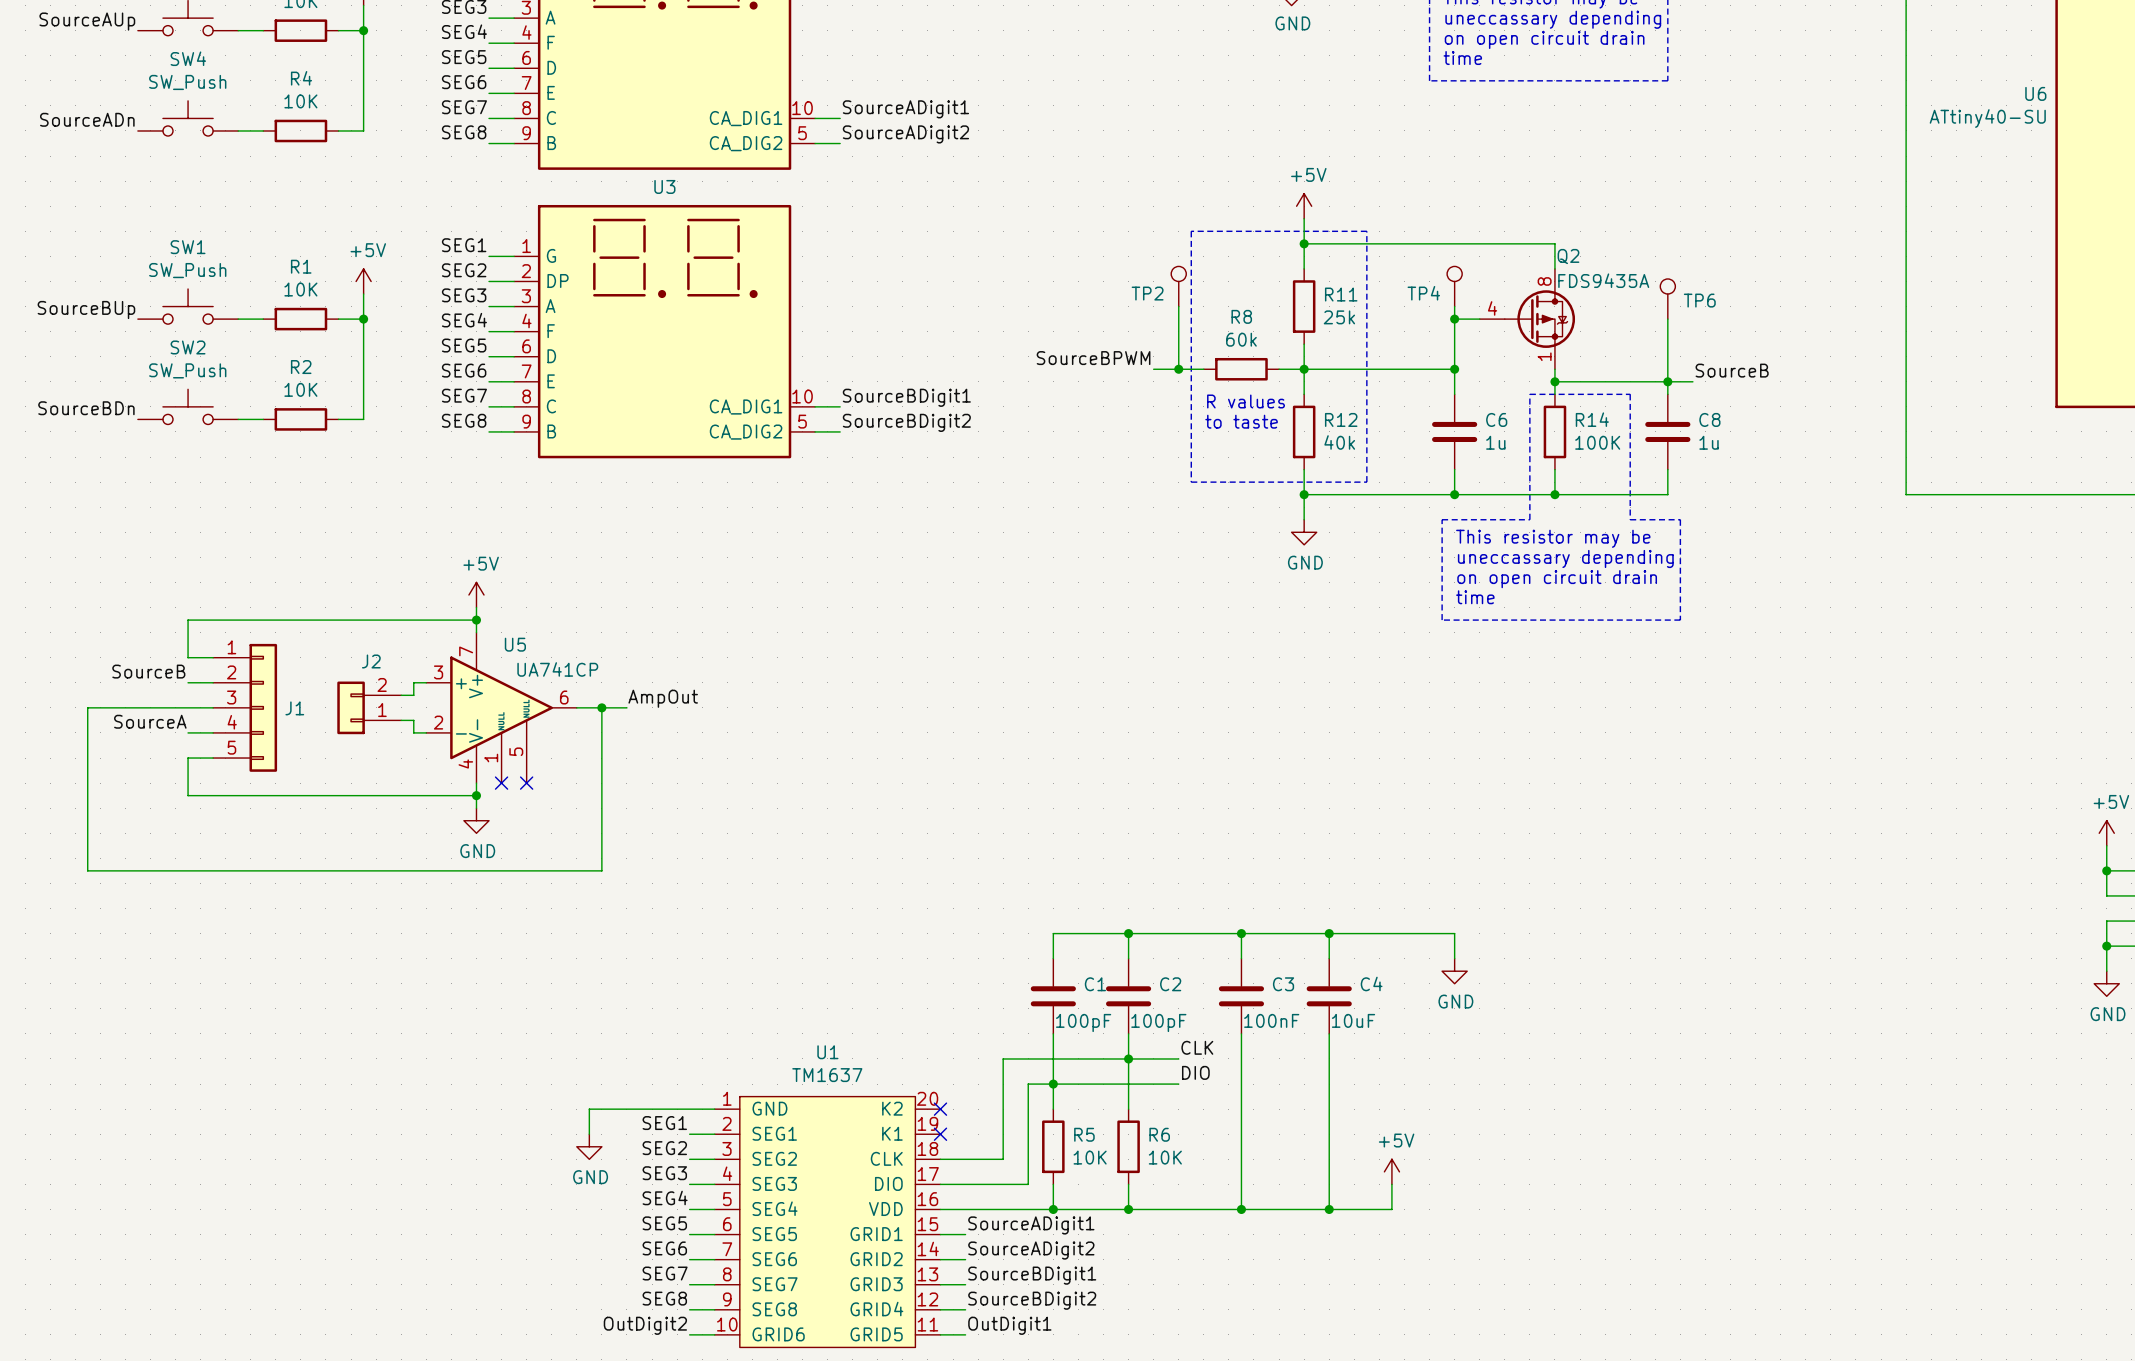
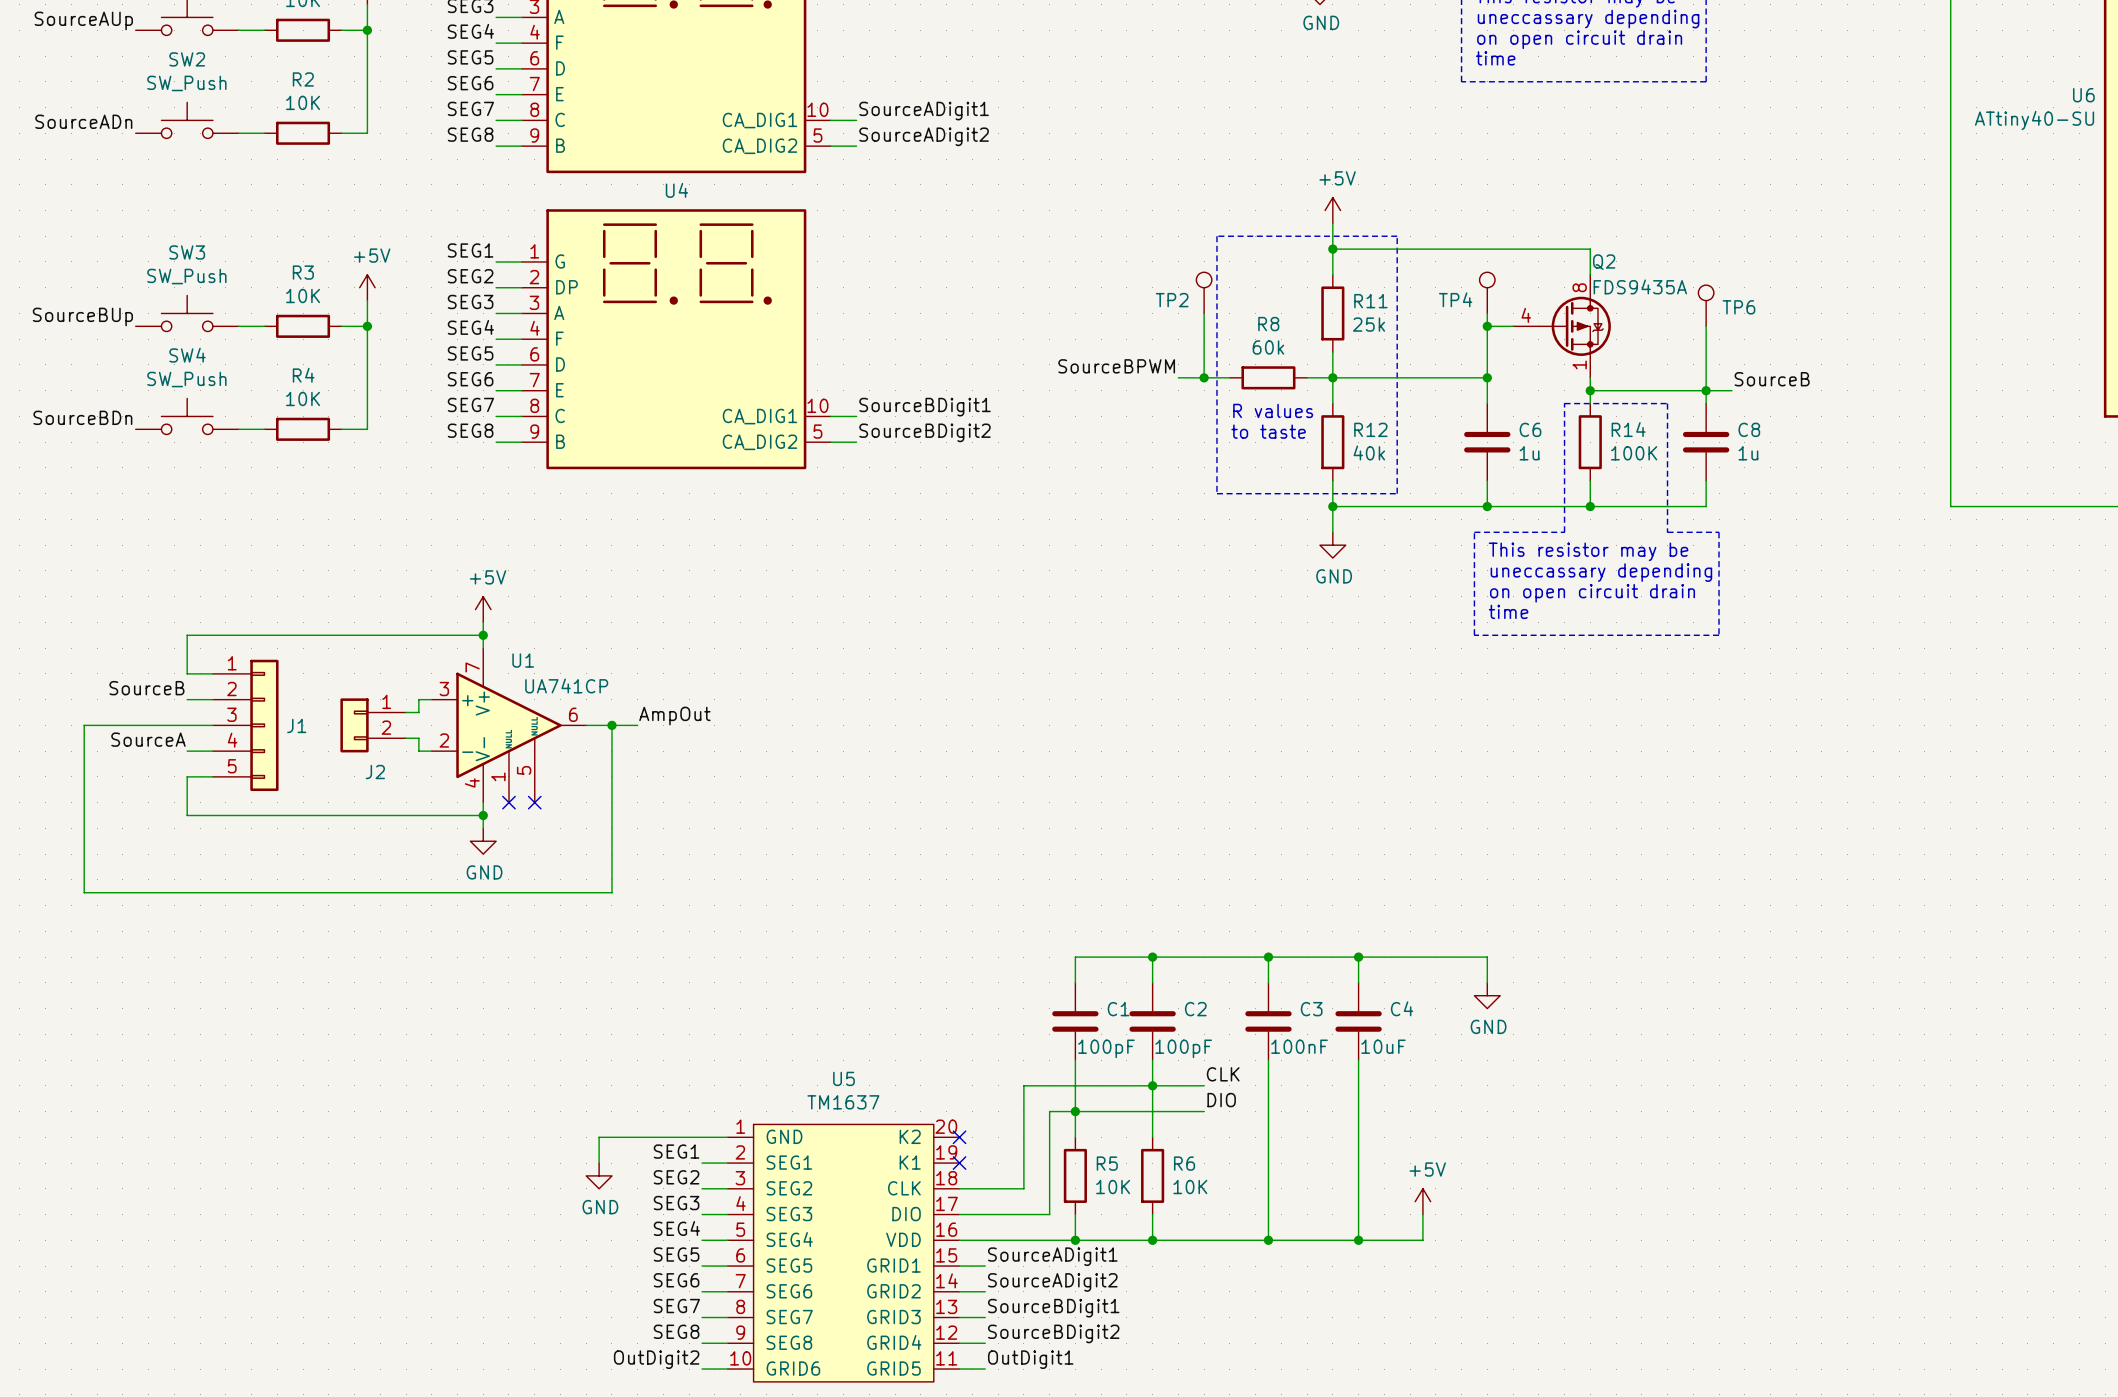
SW4 name: SW4 (188, 58) -> SW2 (187, 59)
R4 name: R4 (301, 78) -> R2 (303, 79)
U3 name: U3 (664, 186) -> U4 (676, 190)
SW1 name: SW1 (188, 247) -> SW3 (187, 252)
R1 name: R1 (301, 266) -> R3 (303, 272)
SW2 name: SW2 (188, 347) -> SW4 (187, 355)
R2 name: R2 (301, 367) -> R4 (303, 375)
U5 name: U5 (515, 644) -> U1 (523, 660)
J2 flip: as is (351, 707) -> up-down (354, 725)
U1 name: U1 (827, 1052) -> U5 (843, 1078)

